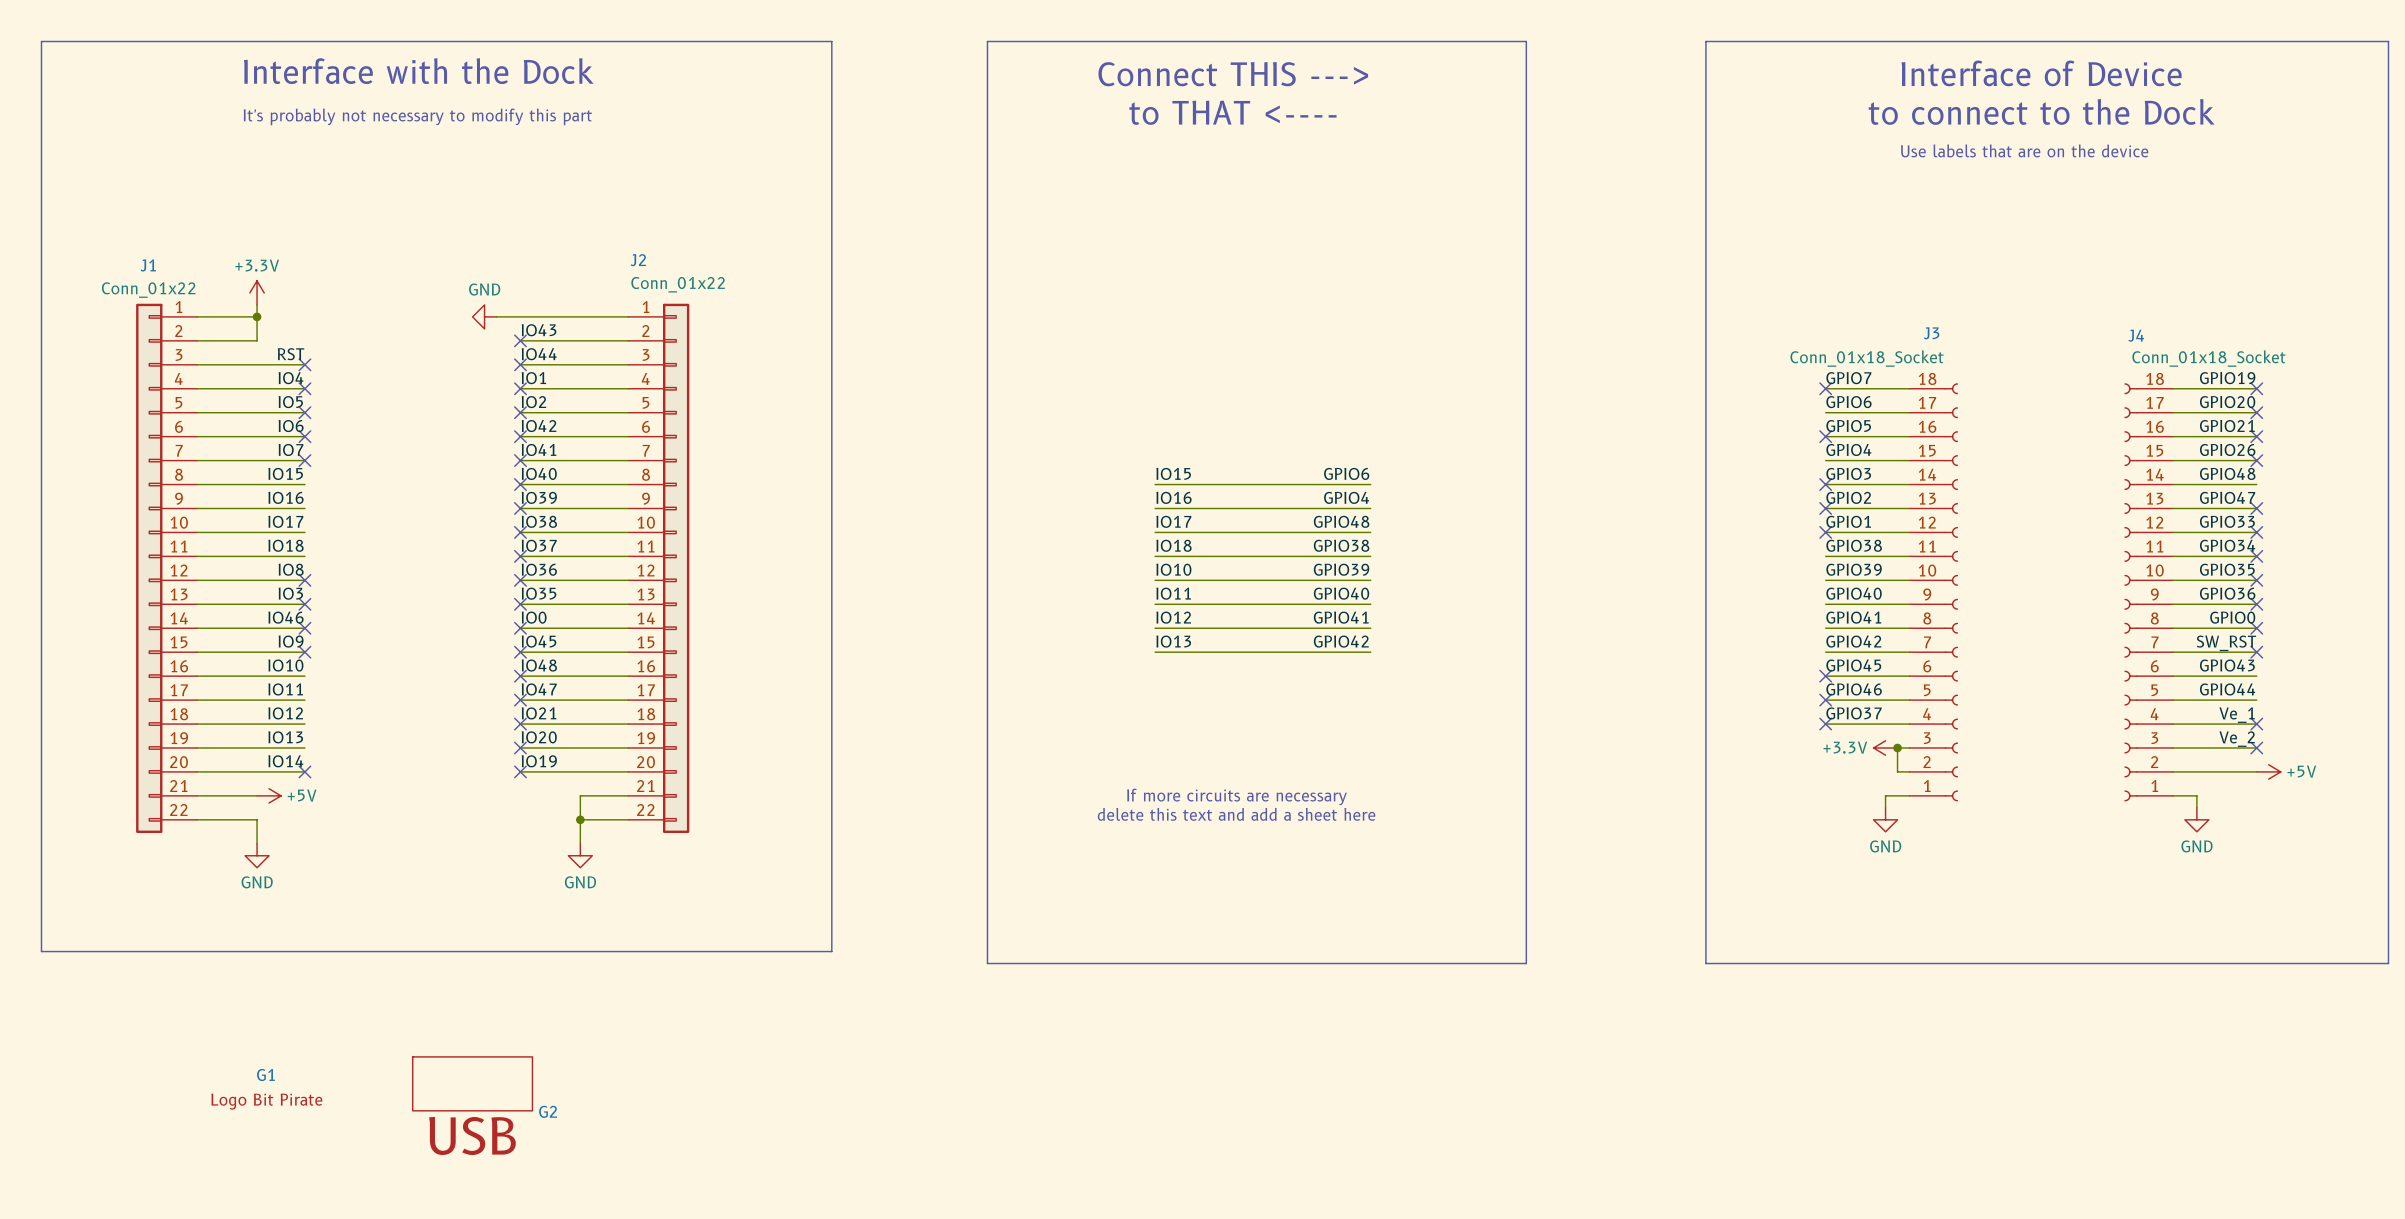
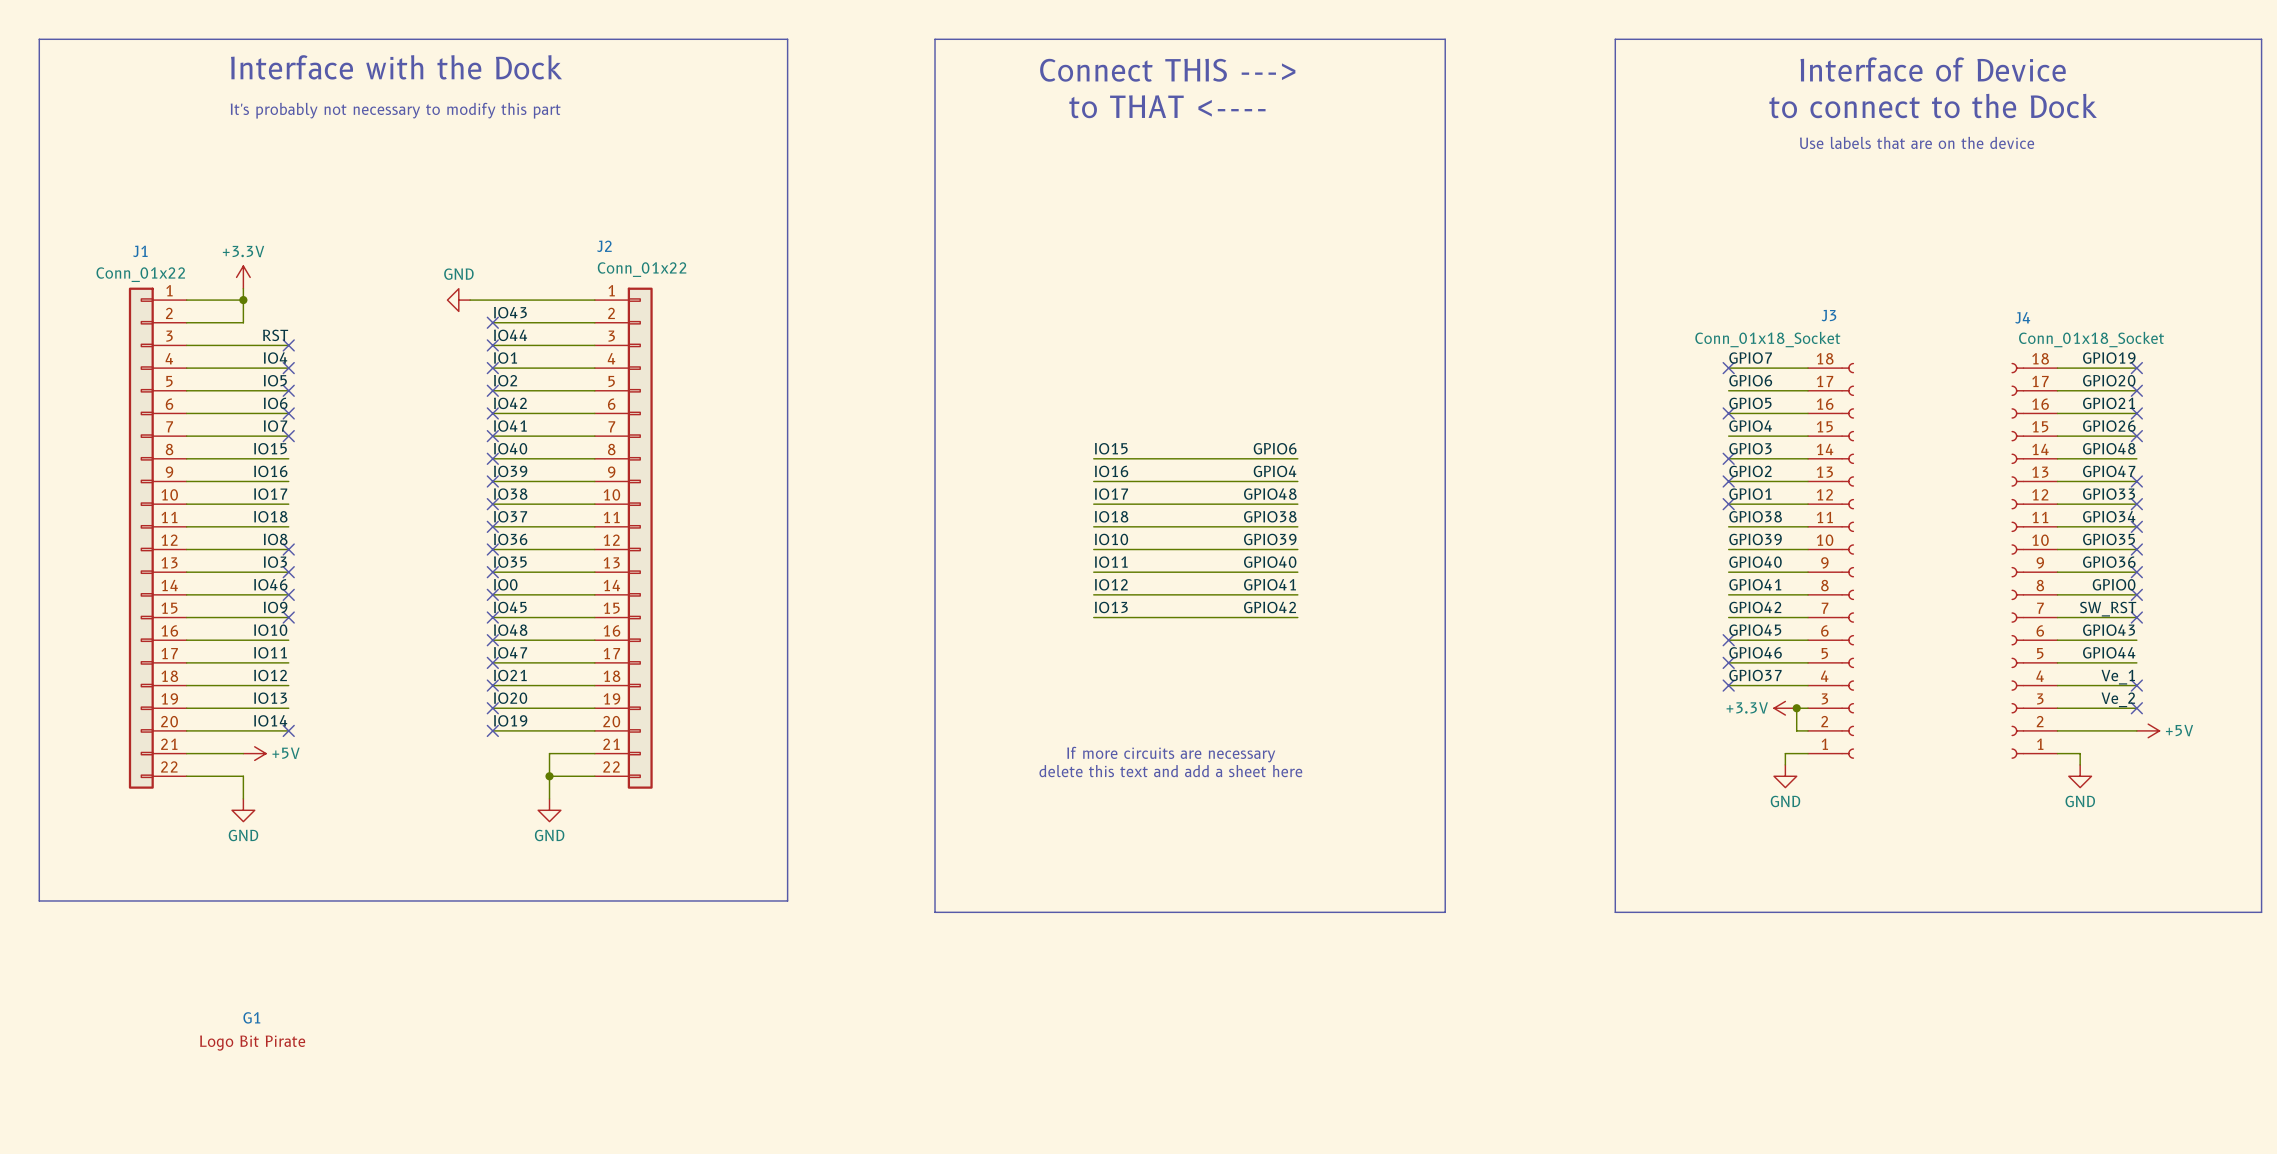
G2: (472, 1083) -> none

